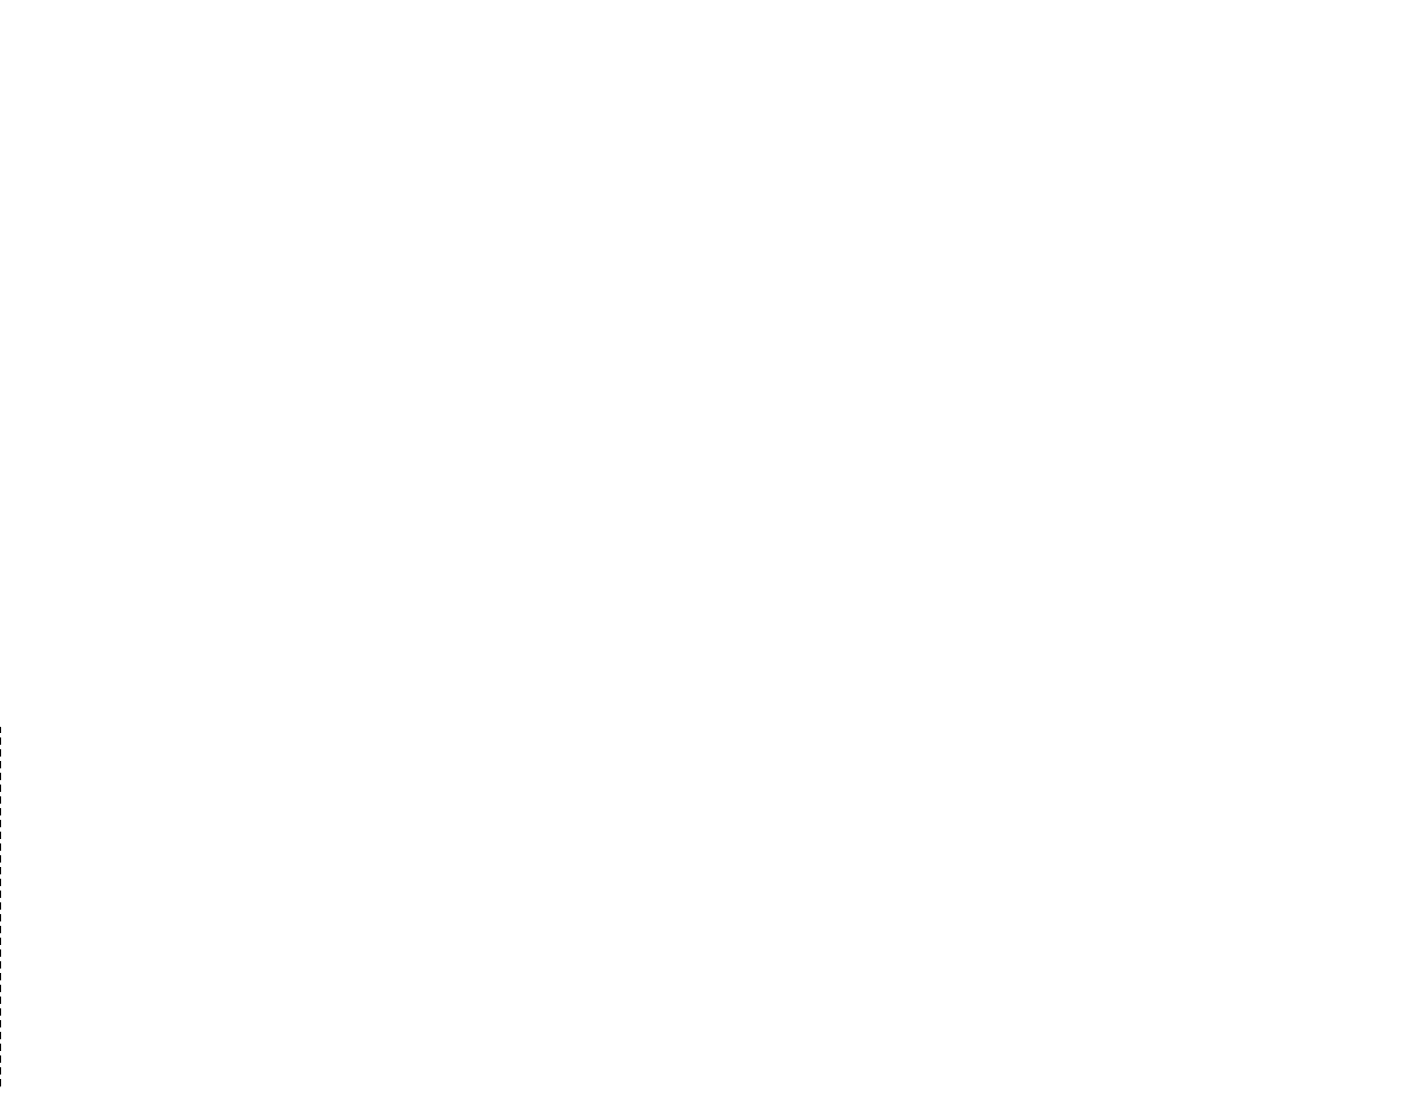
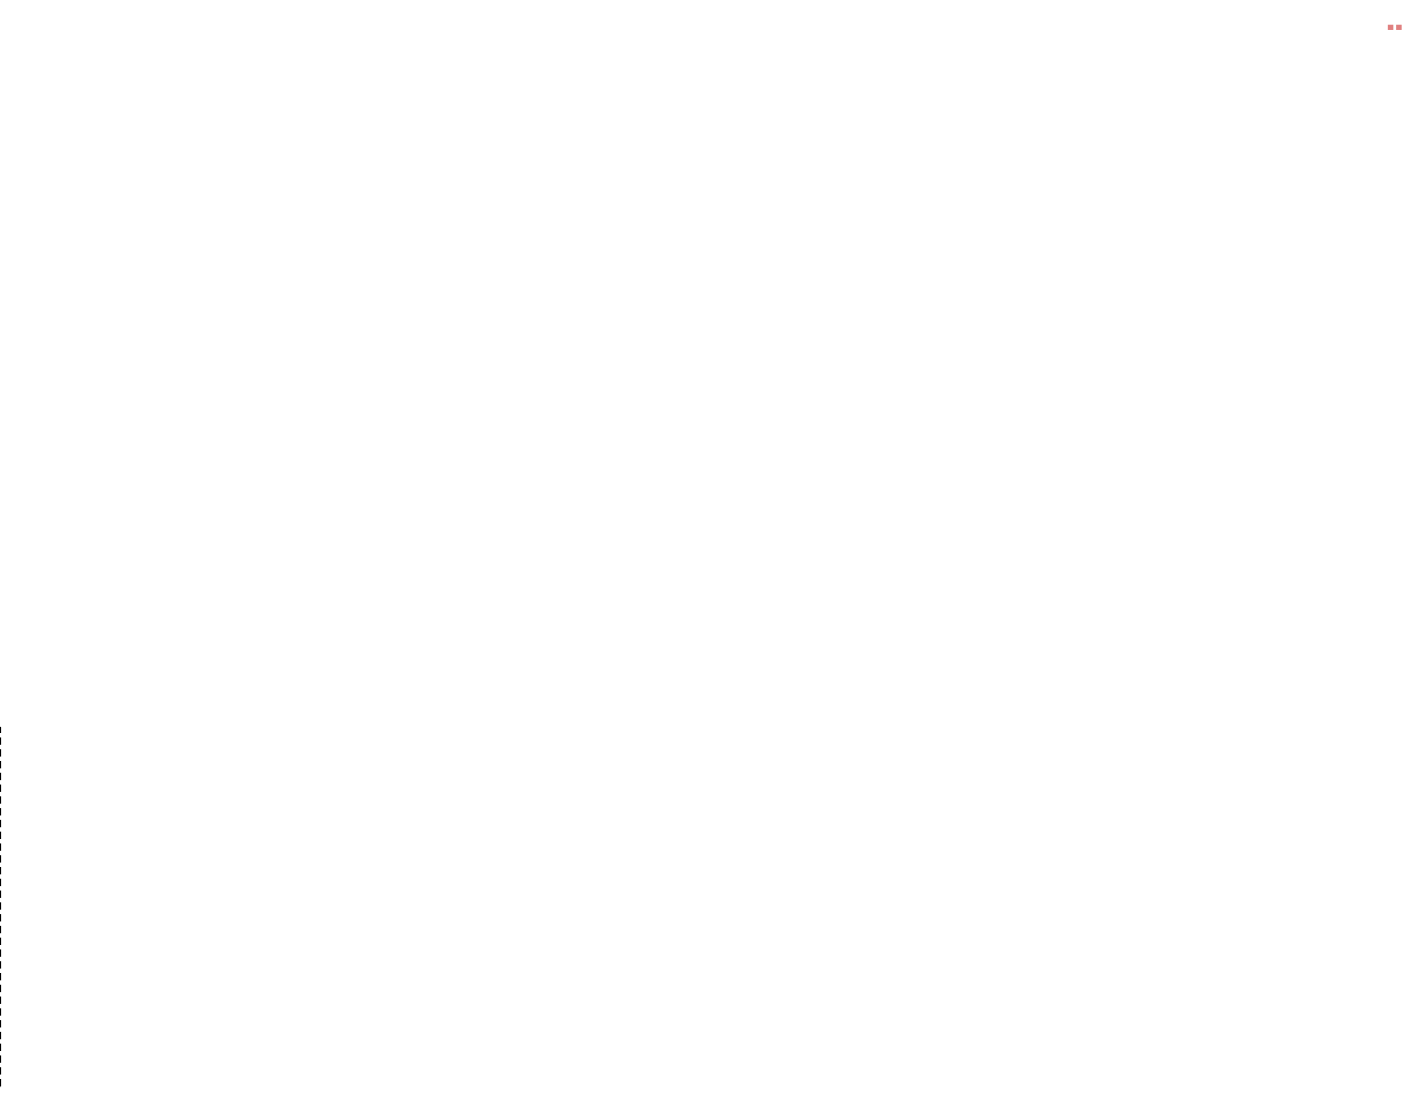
part: none -> (1394, 27)

